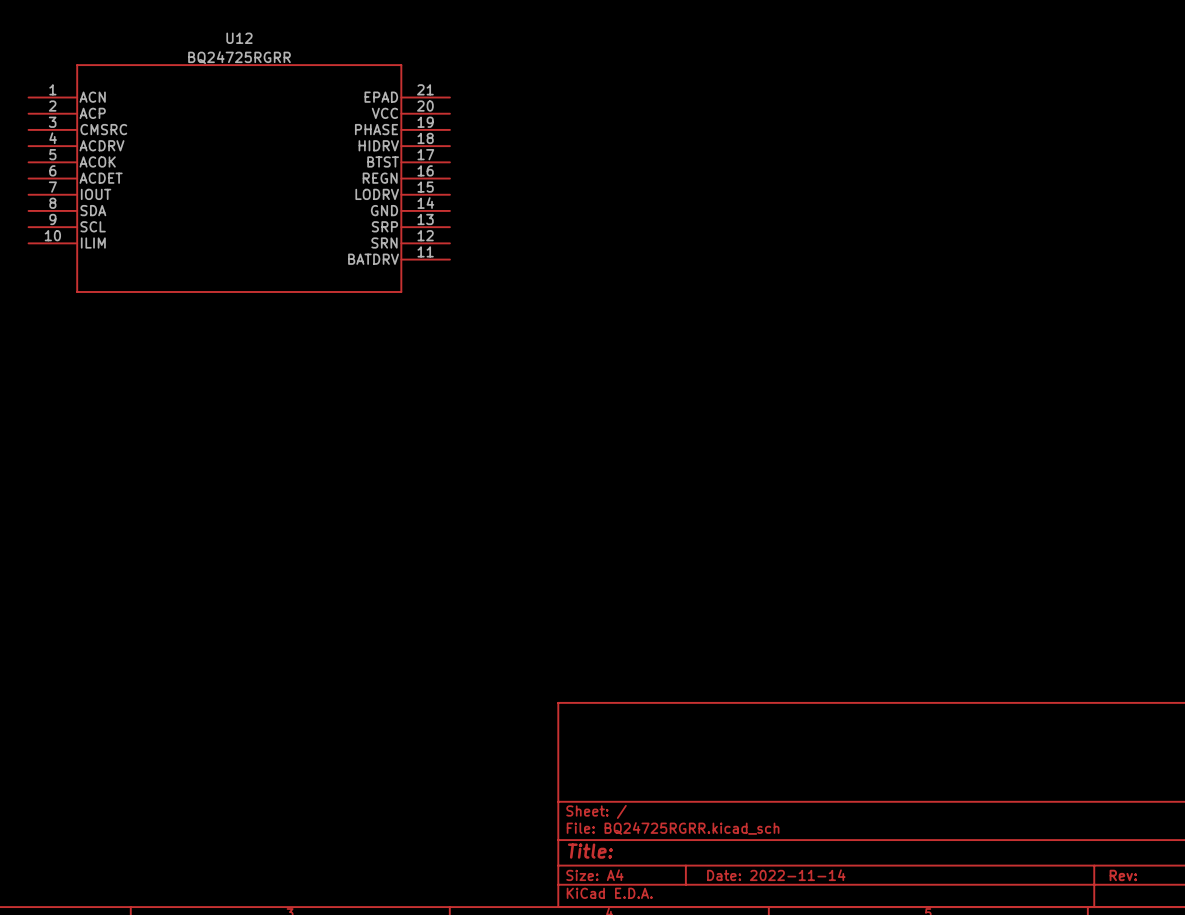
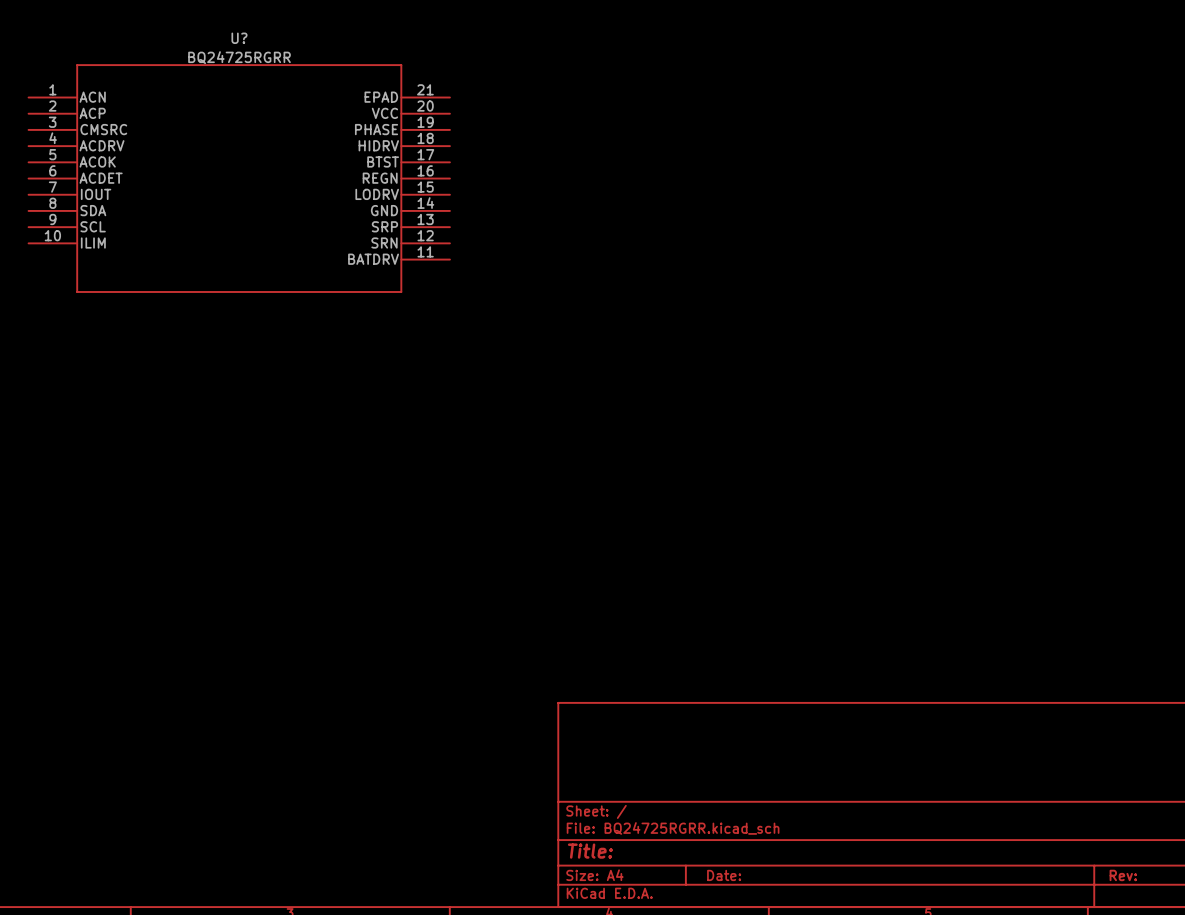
U12 name: U12 (239, 38) -> U? (239, 38)
title block: Date: 2022-11-14 (776, 875) -> Date: (724, 875)

